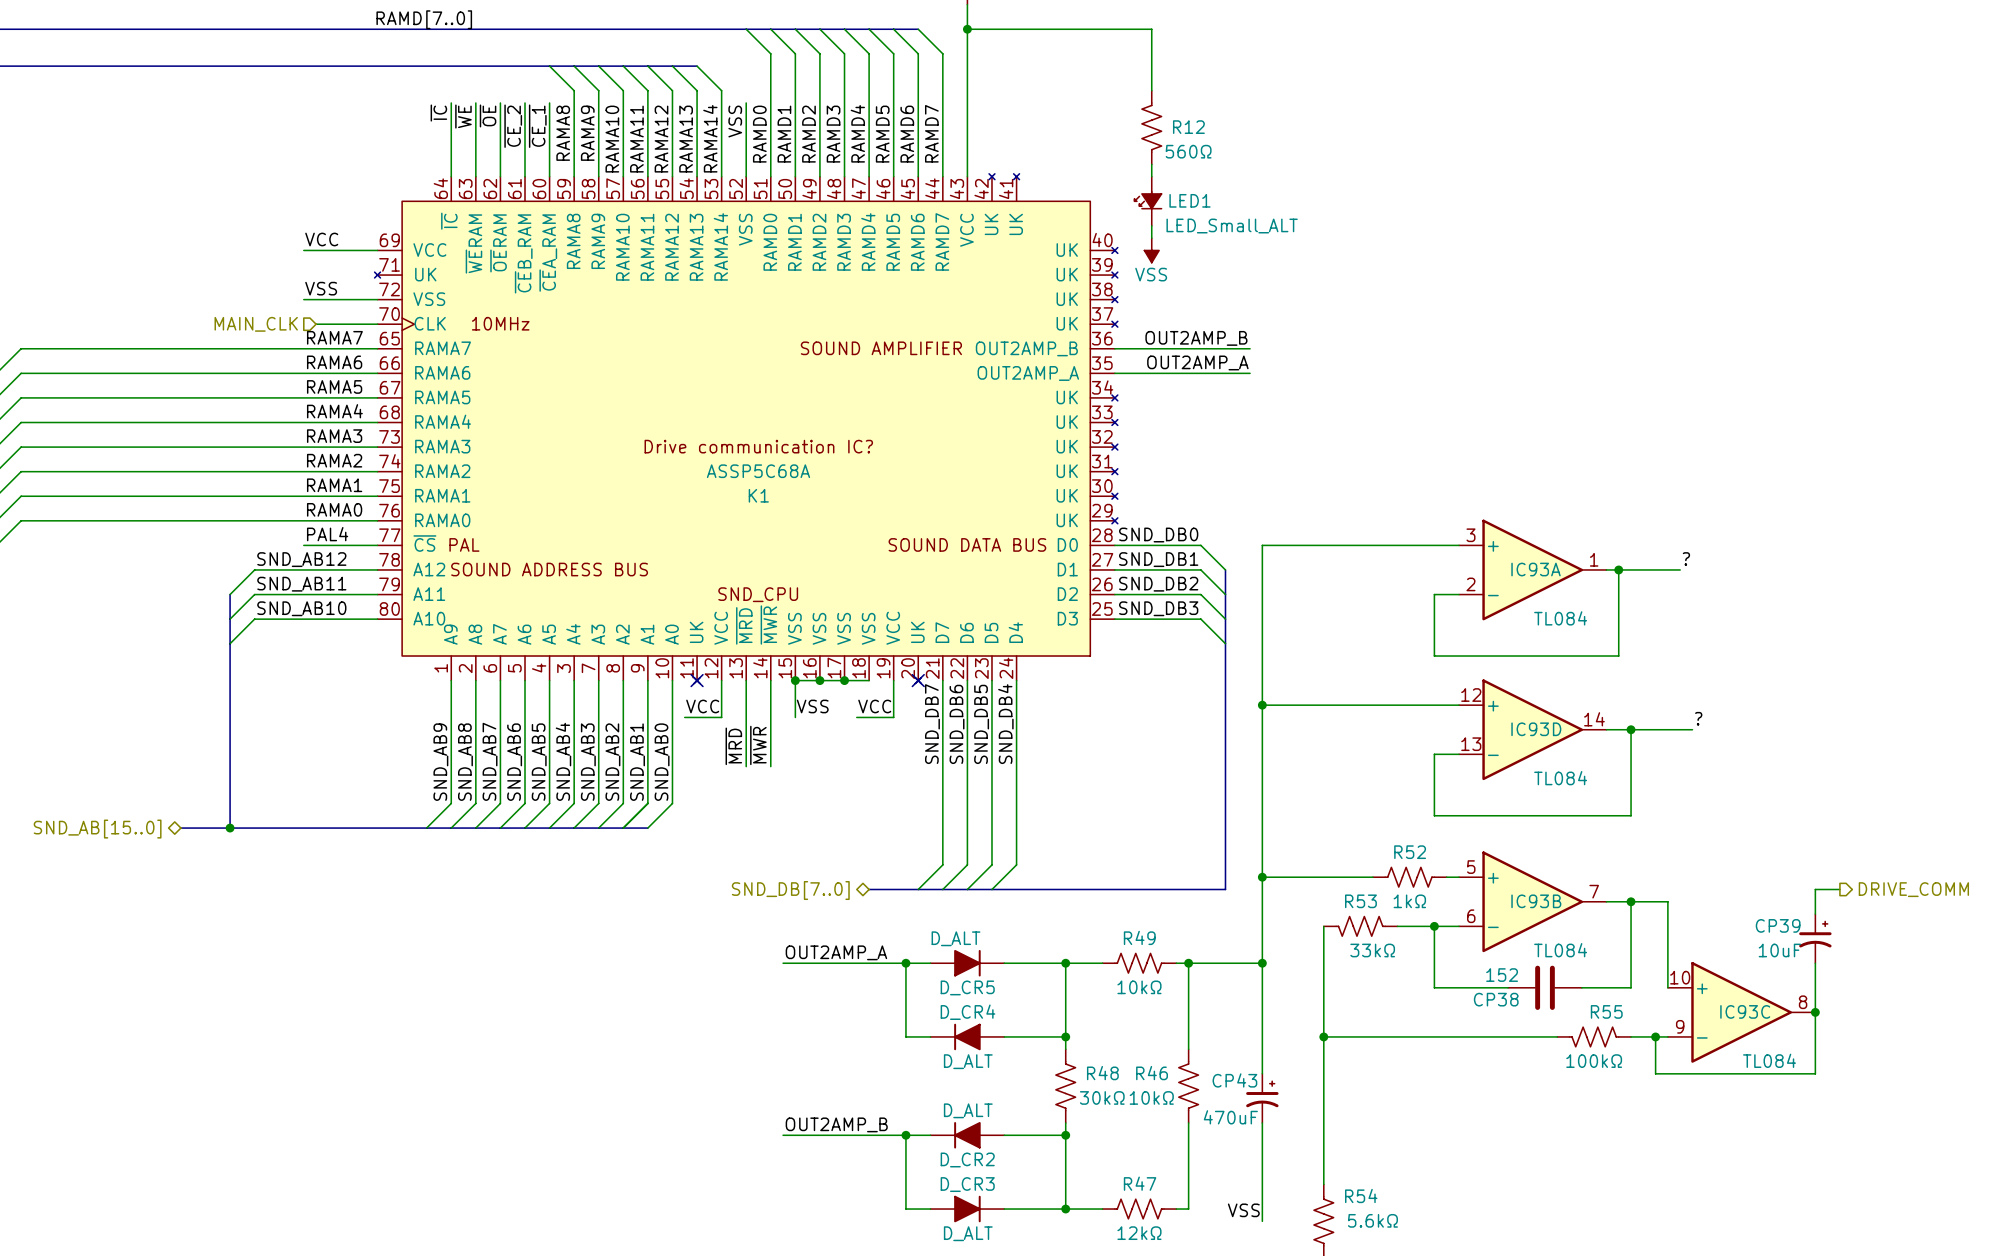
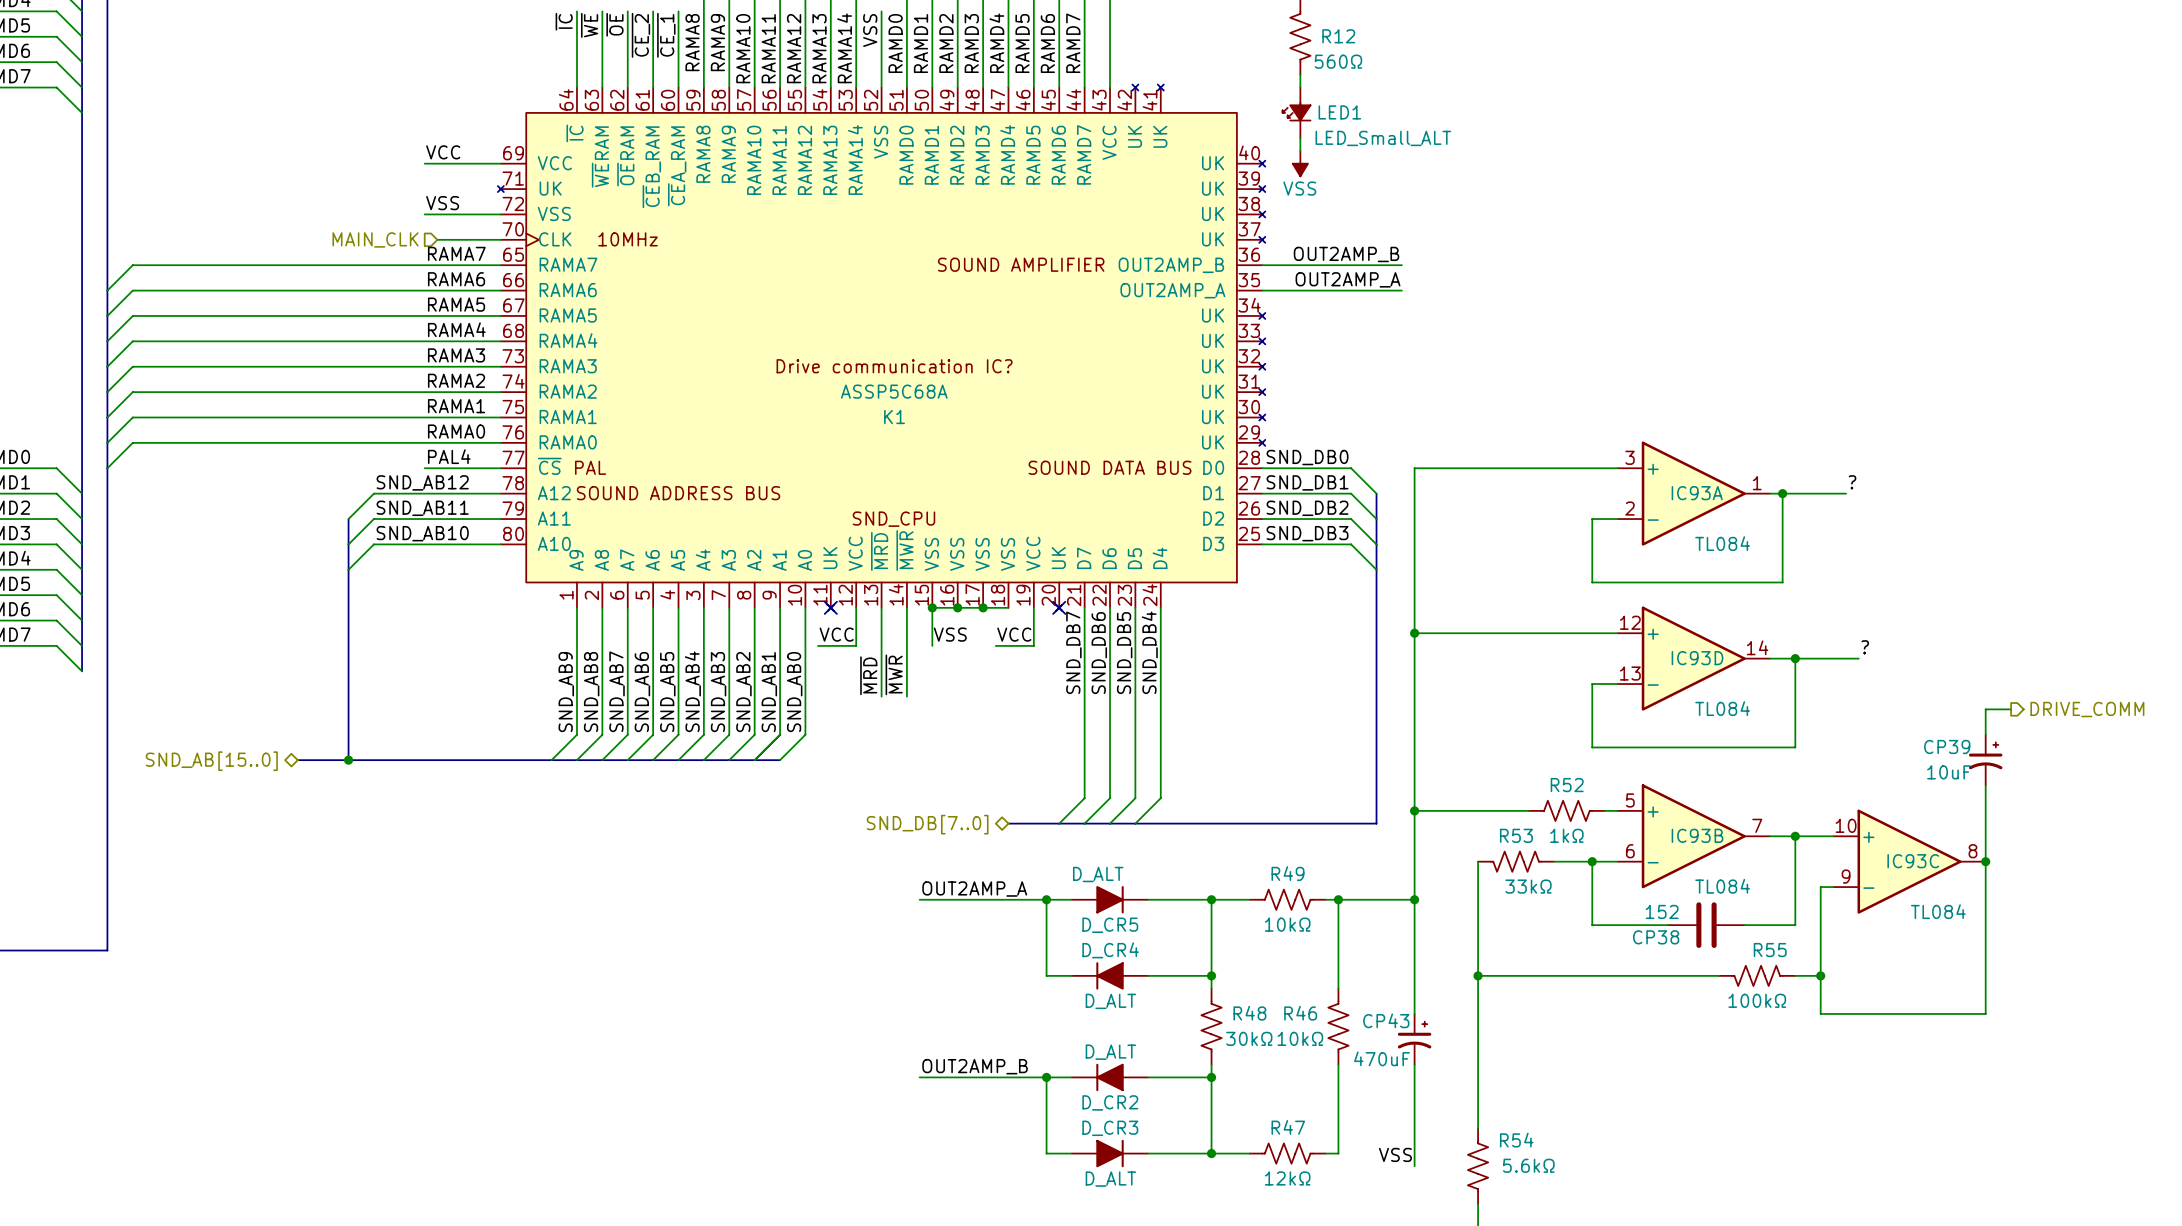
wire: none -> (2011, 709) (1985, 709) (1985, 734)
wire: (1815, 889) (1839, 889) -> (1985, 823) (1985, 785)
hierarchical label position: DRIVE_COMM (1913, 889) -> DRIVE_COMM (2087, 709)
wire: (1667, 901) (1667, 987) -> none
junction: none -> (1985, 861)
CP39 position: (1815, 938) -> (1985, 760)
IC93C position: (1741, 1012) -> (1909, 861)
junction: (1815, 1012) -> none
wire: (1655, 1036) (1667, 1036) -> (1820, 975) (1820, 887) (1833, 887)

